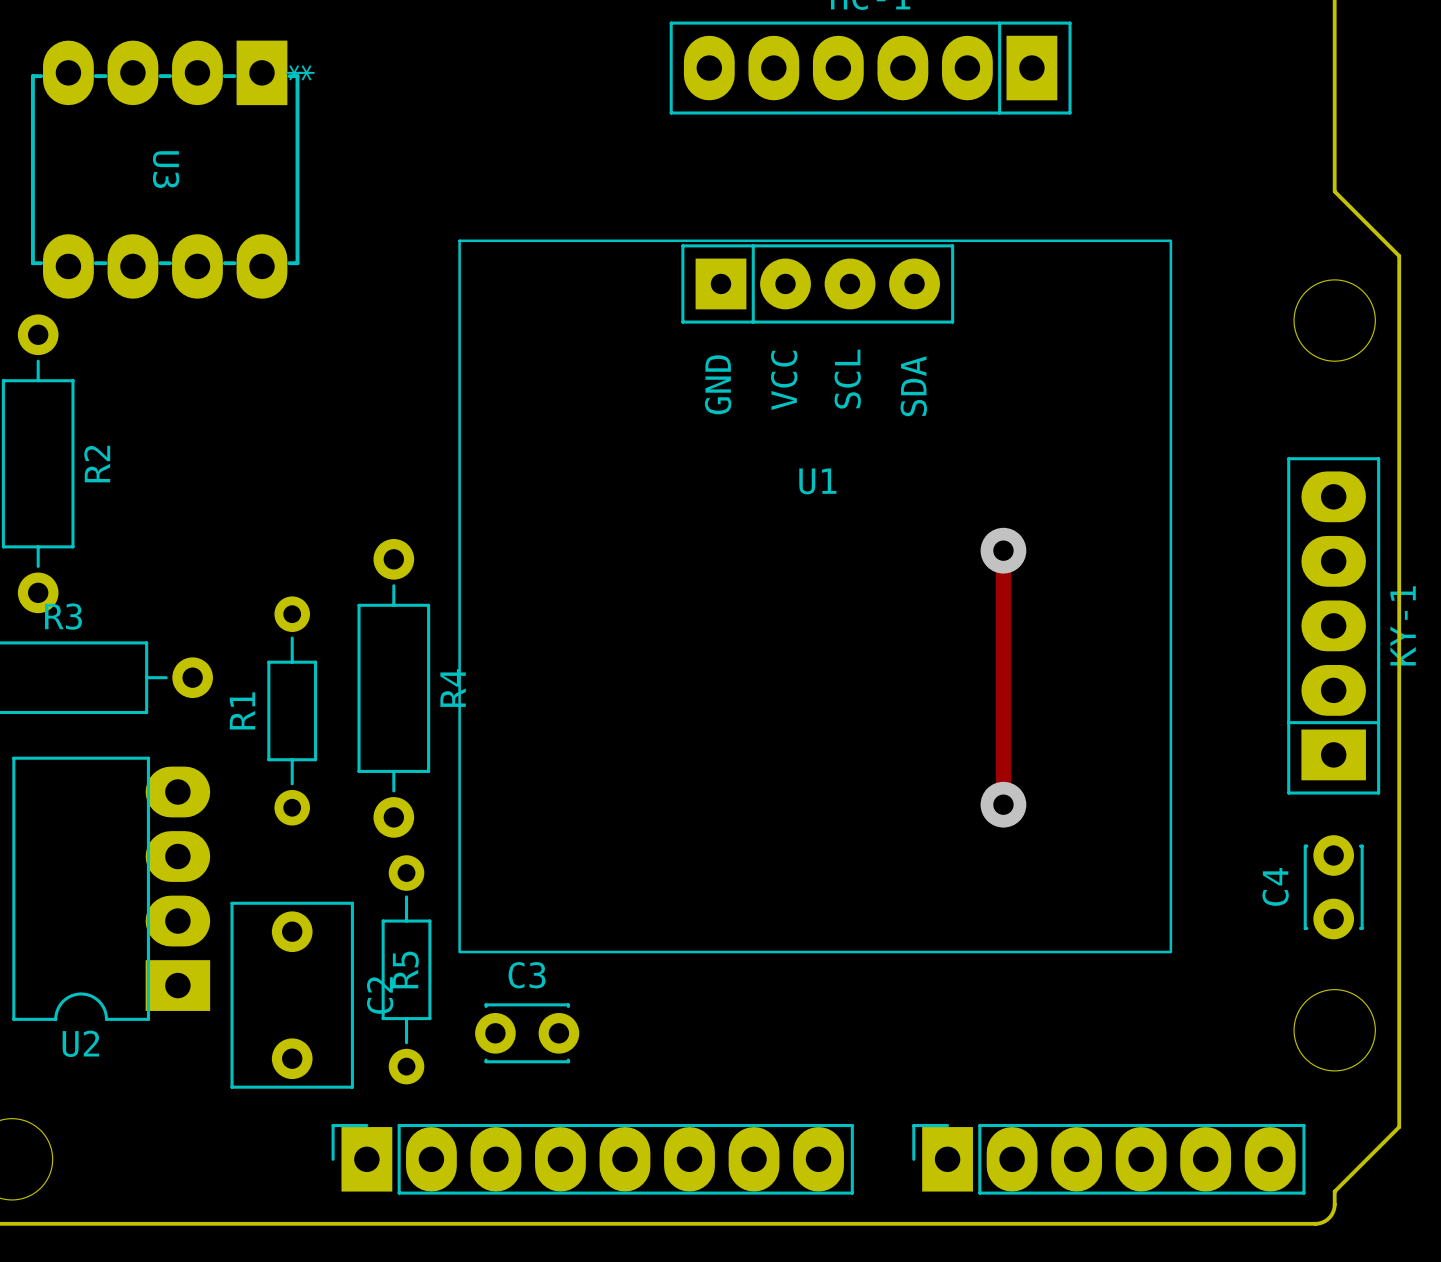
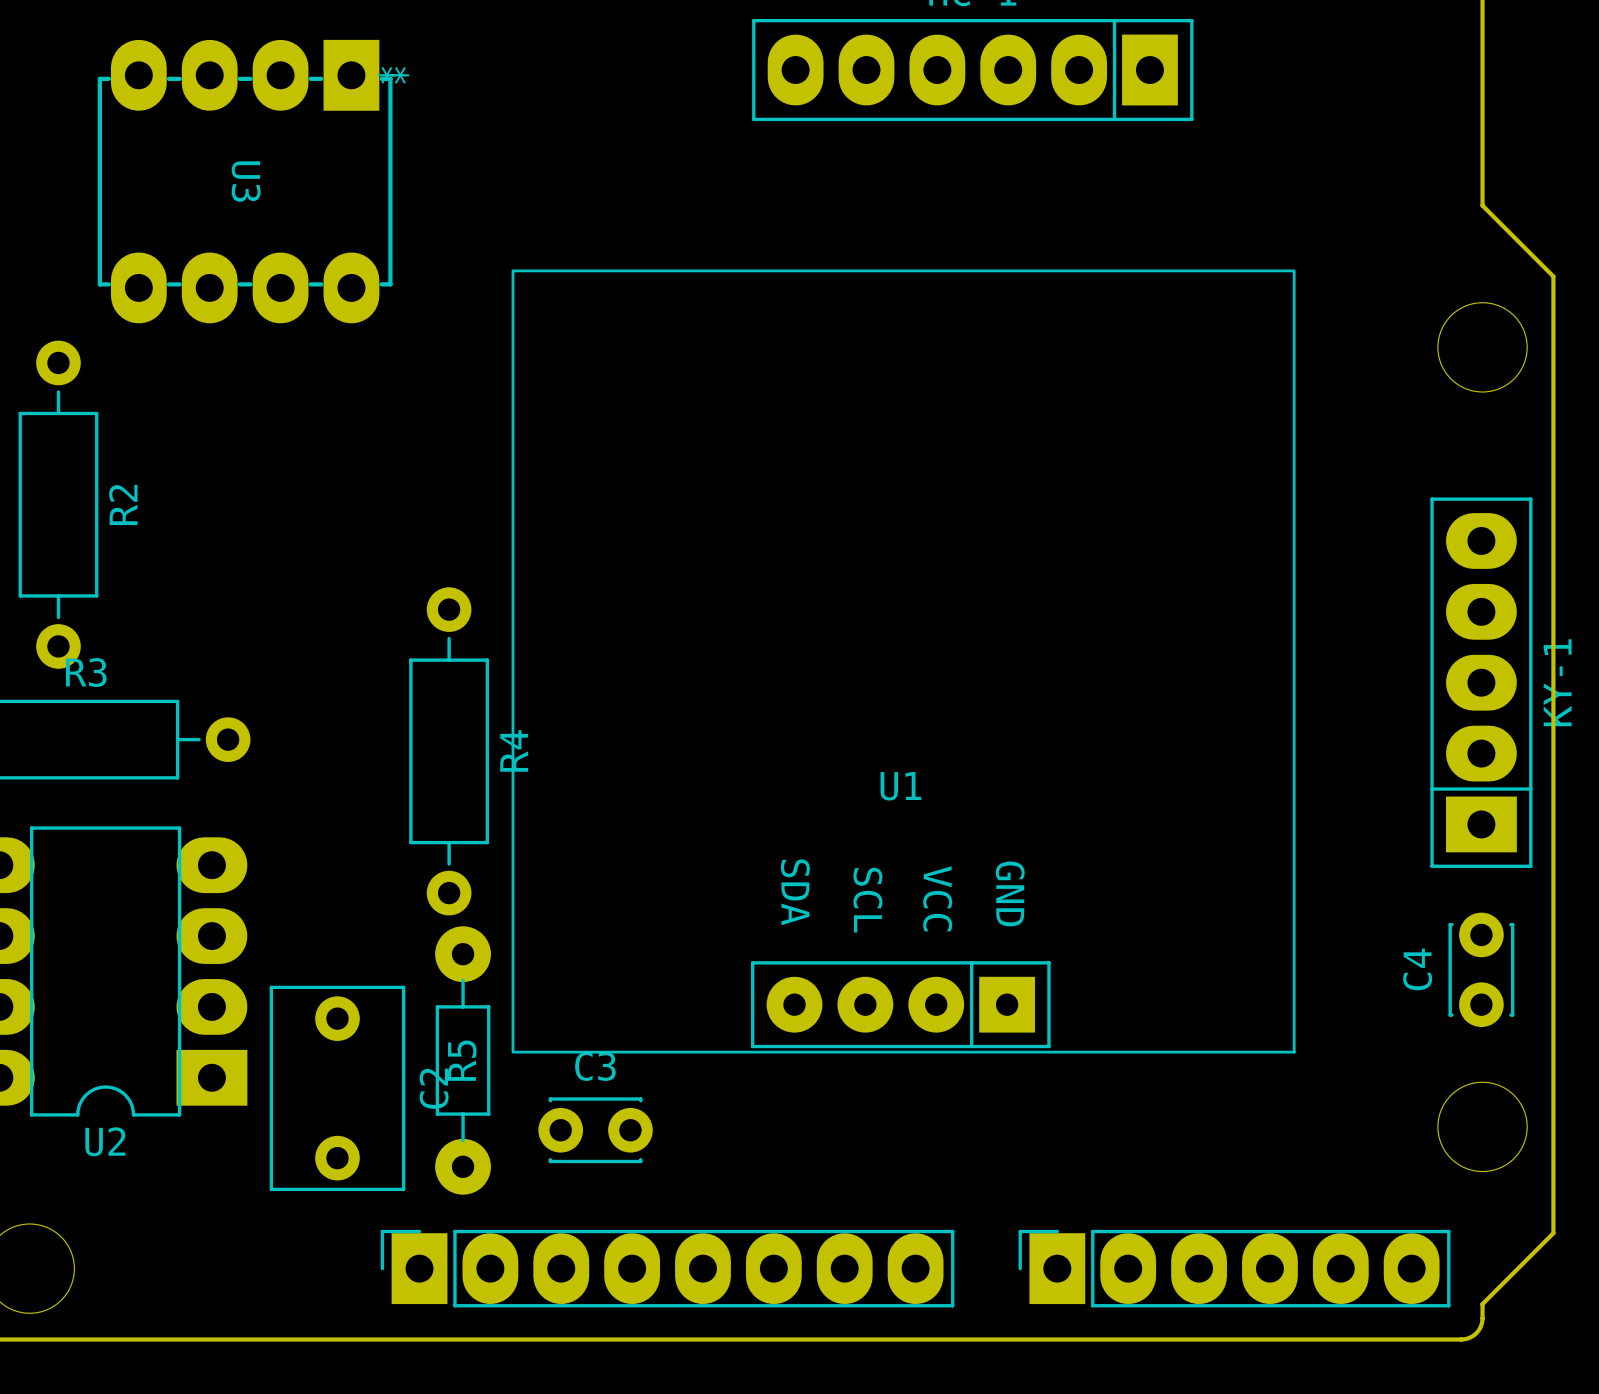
U3 position: (165, 169) -> (245, 181)
track: (1003, 550) (1003, 804) -> none
via: (1003, 550) -> none
U1 rotation: 0° (815, 596) -> 180° (903, 661)
R1: (292, 710) -> none
via: (1003, 804) -> none
R5 footprint: [381, 855, 432, 1085] -> [435, 926, 491, 1195]

